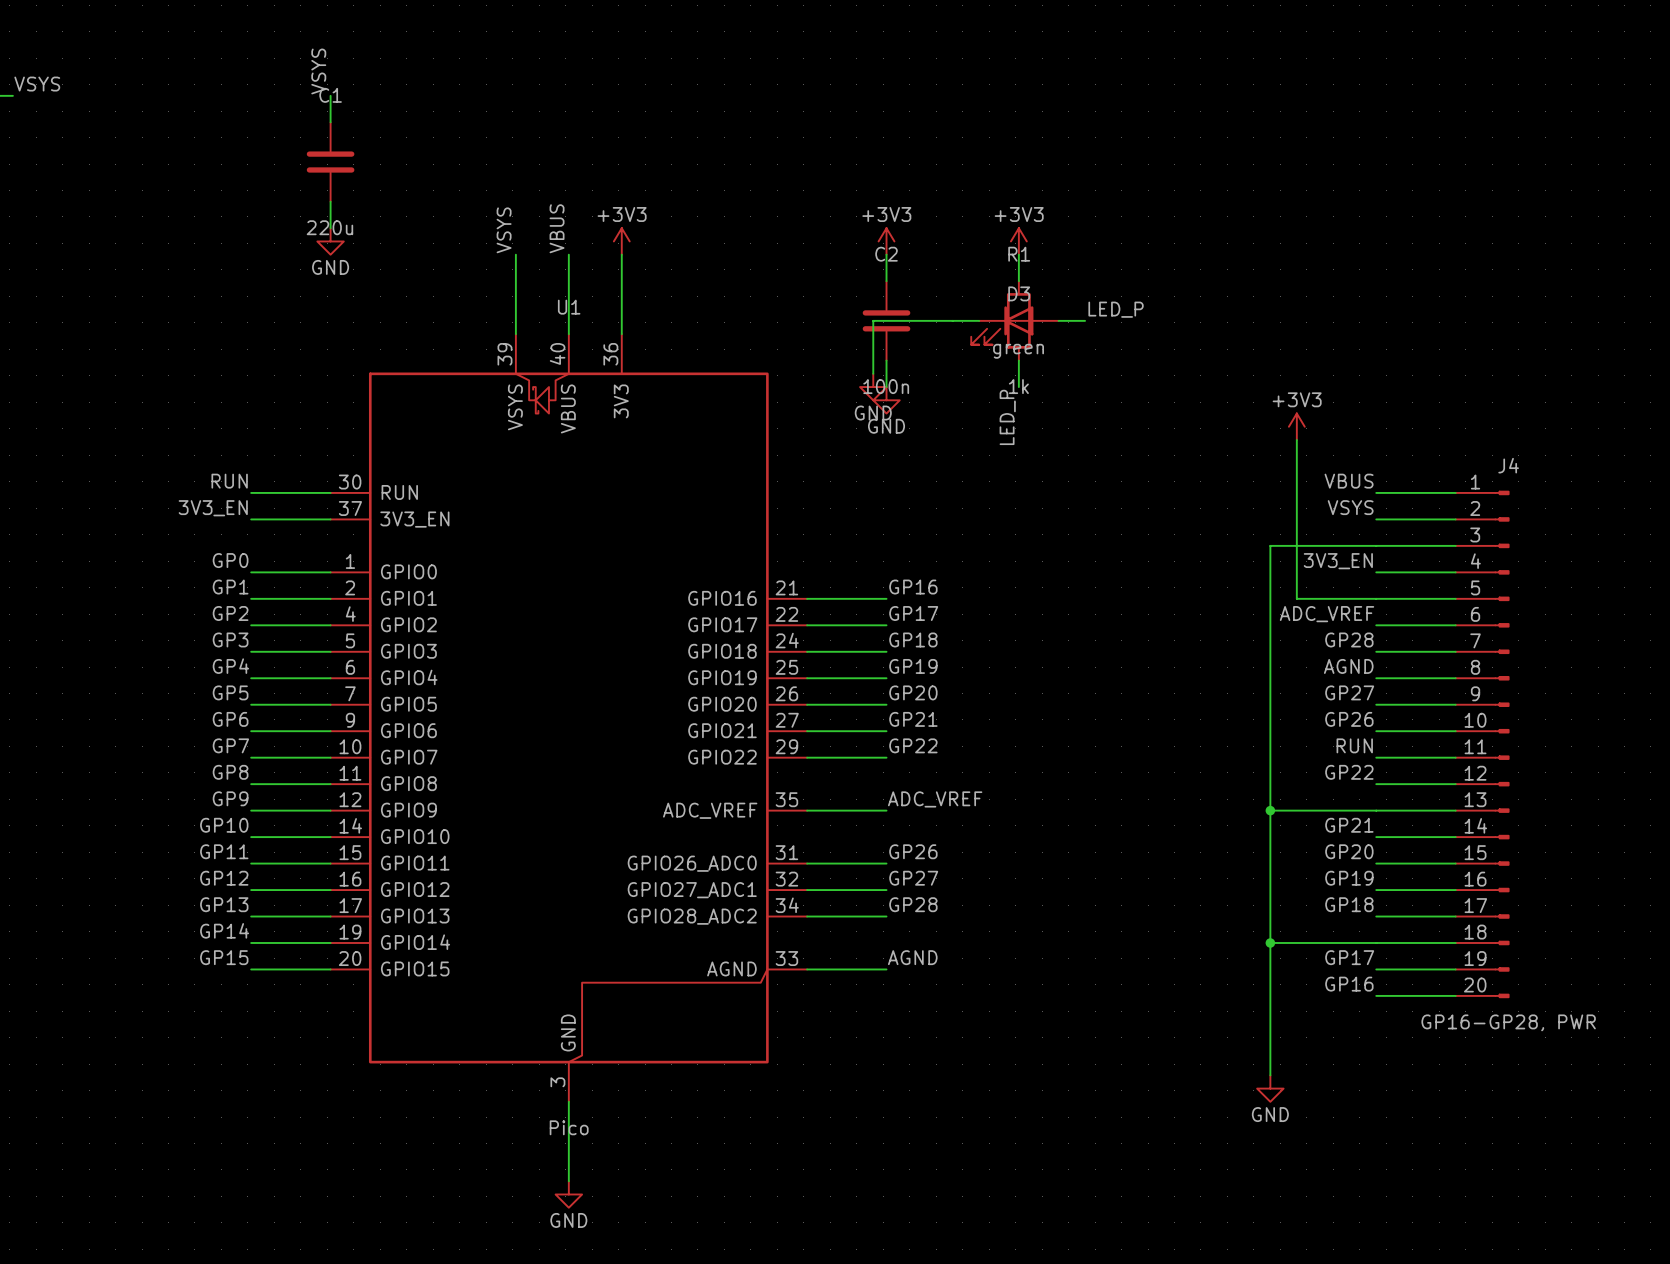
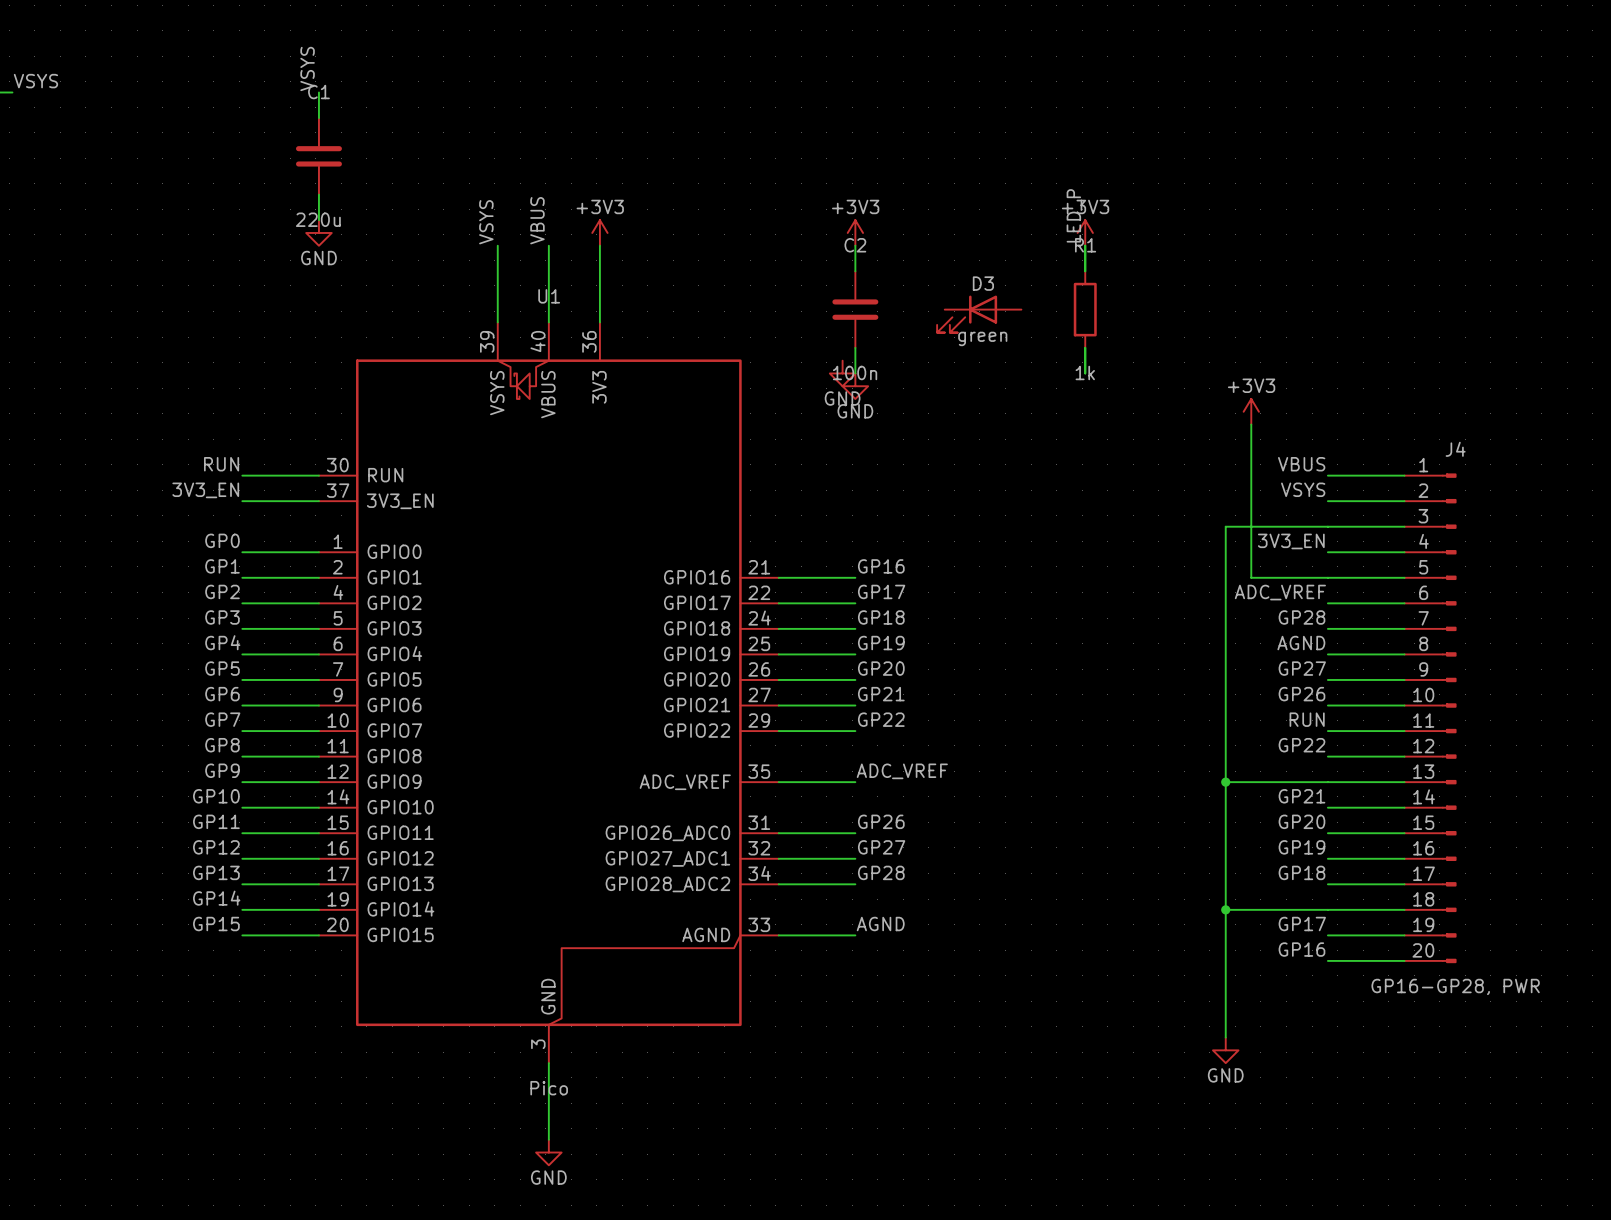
power symbol position: +3V3 (1018, 241) -> +3V3 (1085, 232)
wire: (1018, 254) (1018, 281) -> (1085, 245) (1085, 271)
label rotation: 0° (1116, 309) -> 90° counterclockwise (1074, 215)
label position: LED_P (1116, 309) -> LED_P (1074, 215)
wire: (979, 320) (873, 320) (873, 373) -> none
R1 position: (1018, 320) -> (1085, 309)
wire: (1058, 320) (1085, 320) -> none
wire: (1018, 360) (1018, 387) -> (1085, 347) (1085, 373)
label: LED_P (1007, 417) -> none

